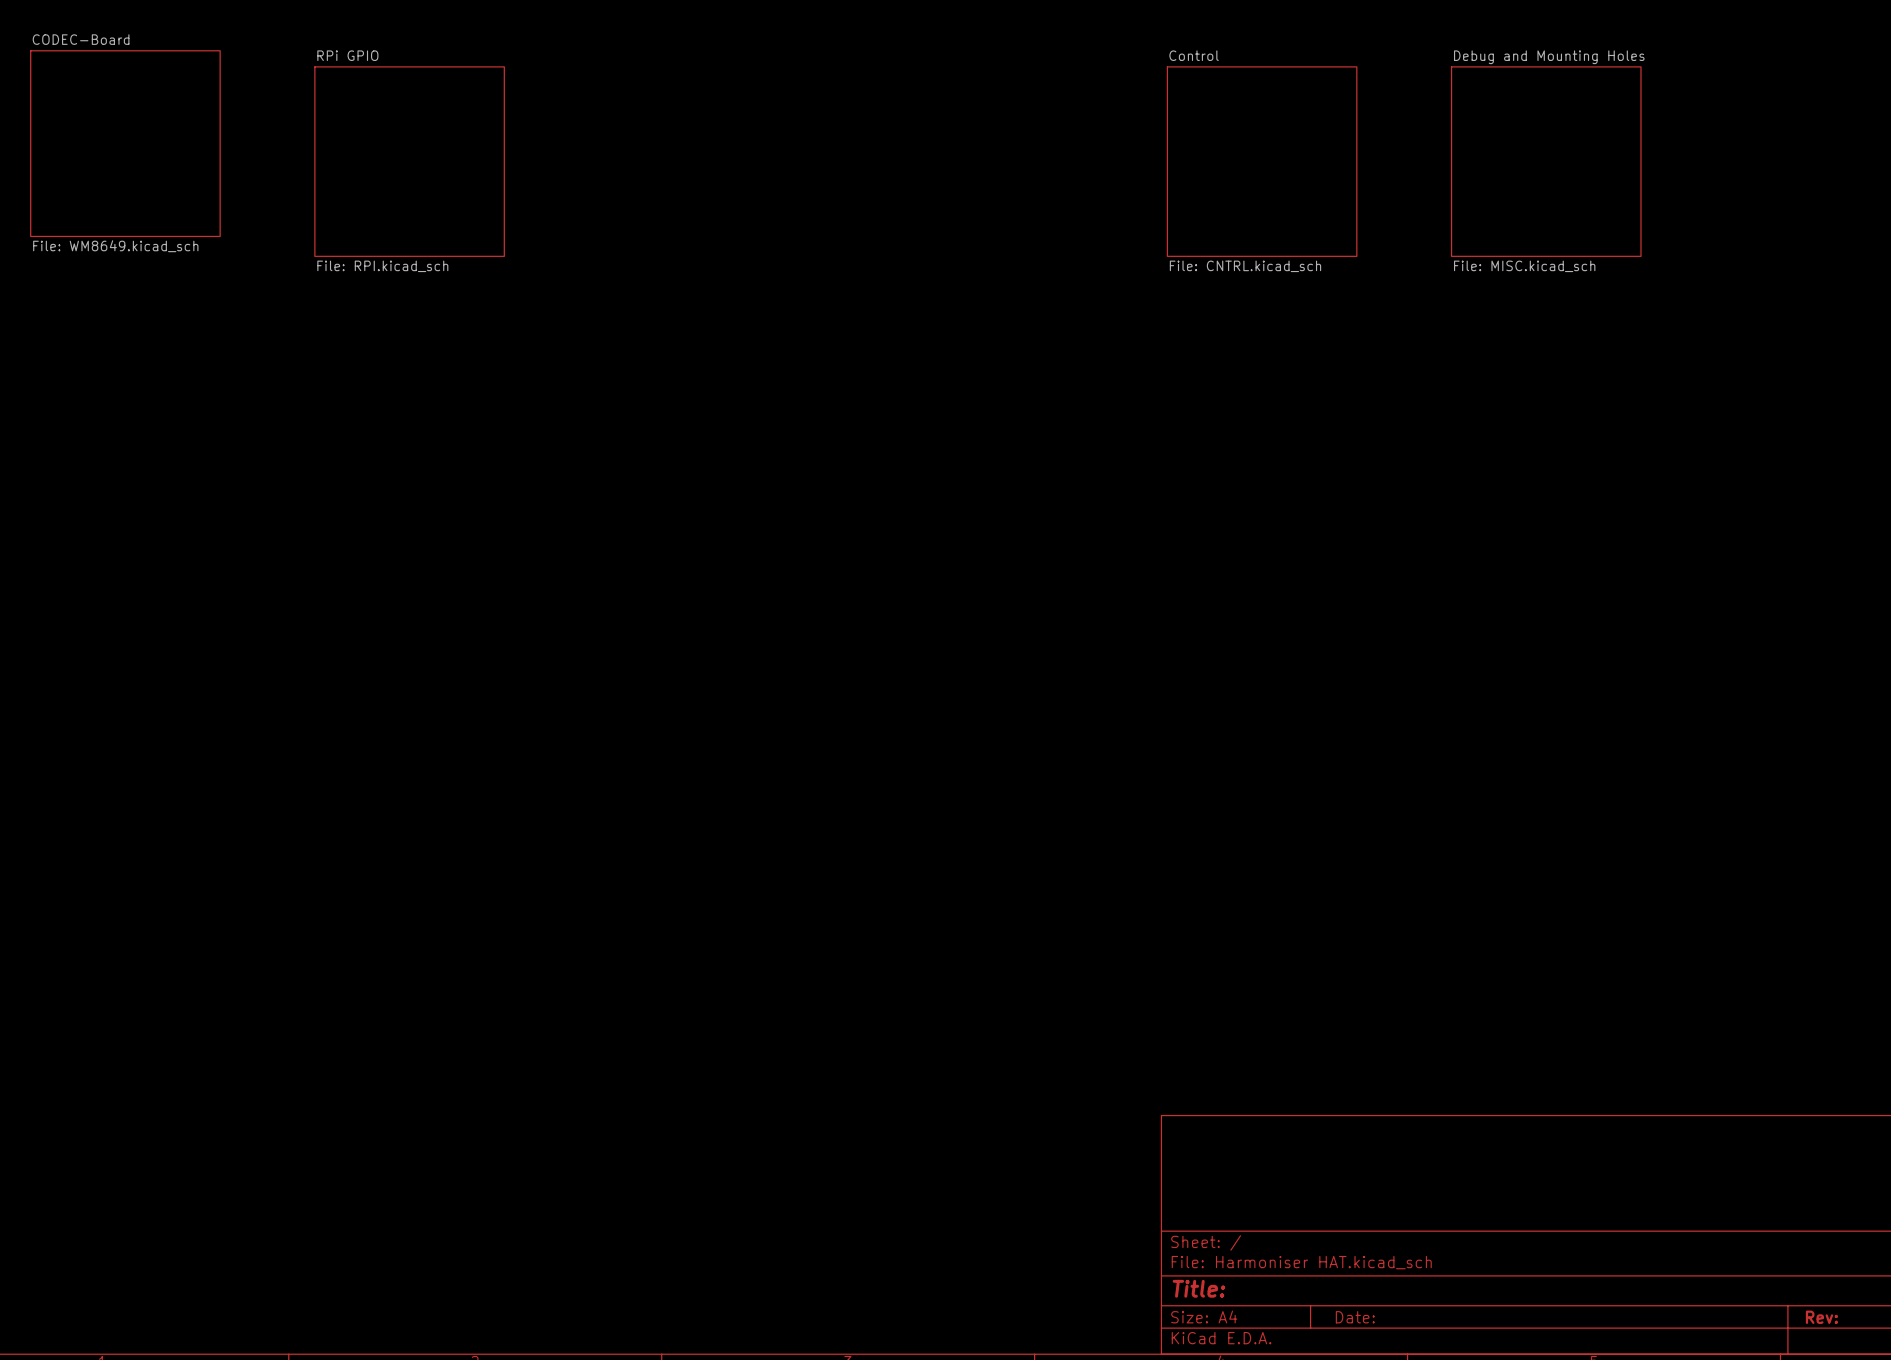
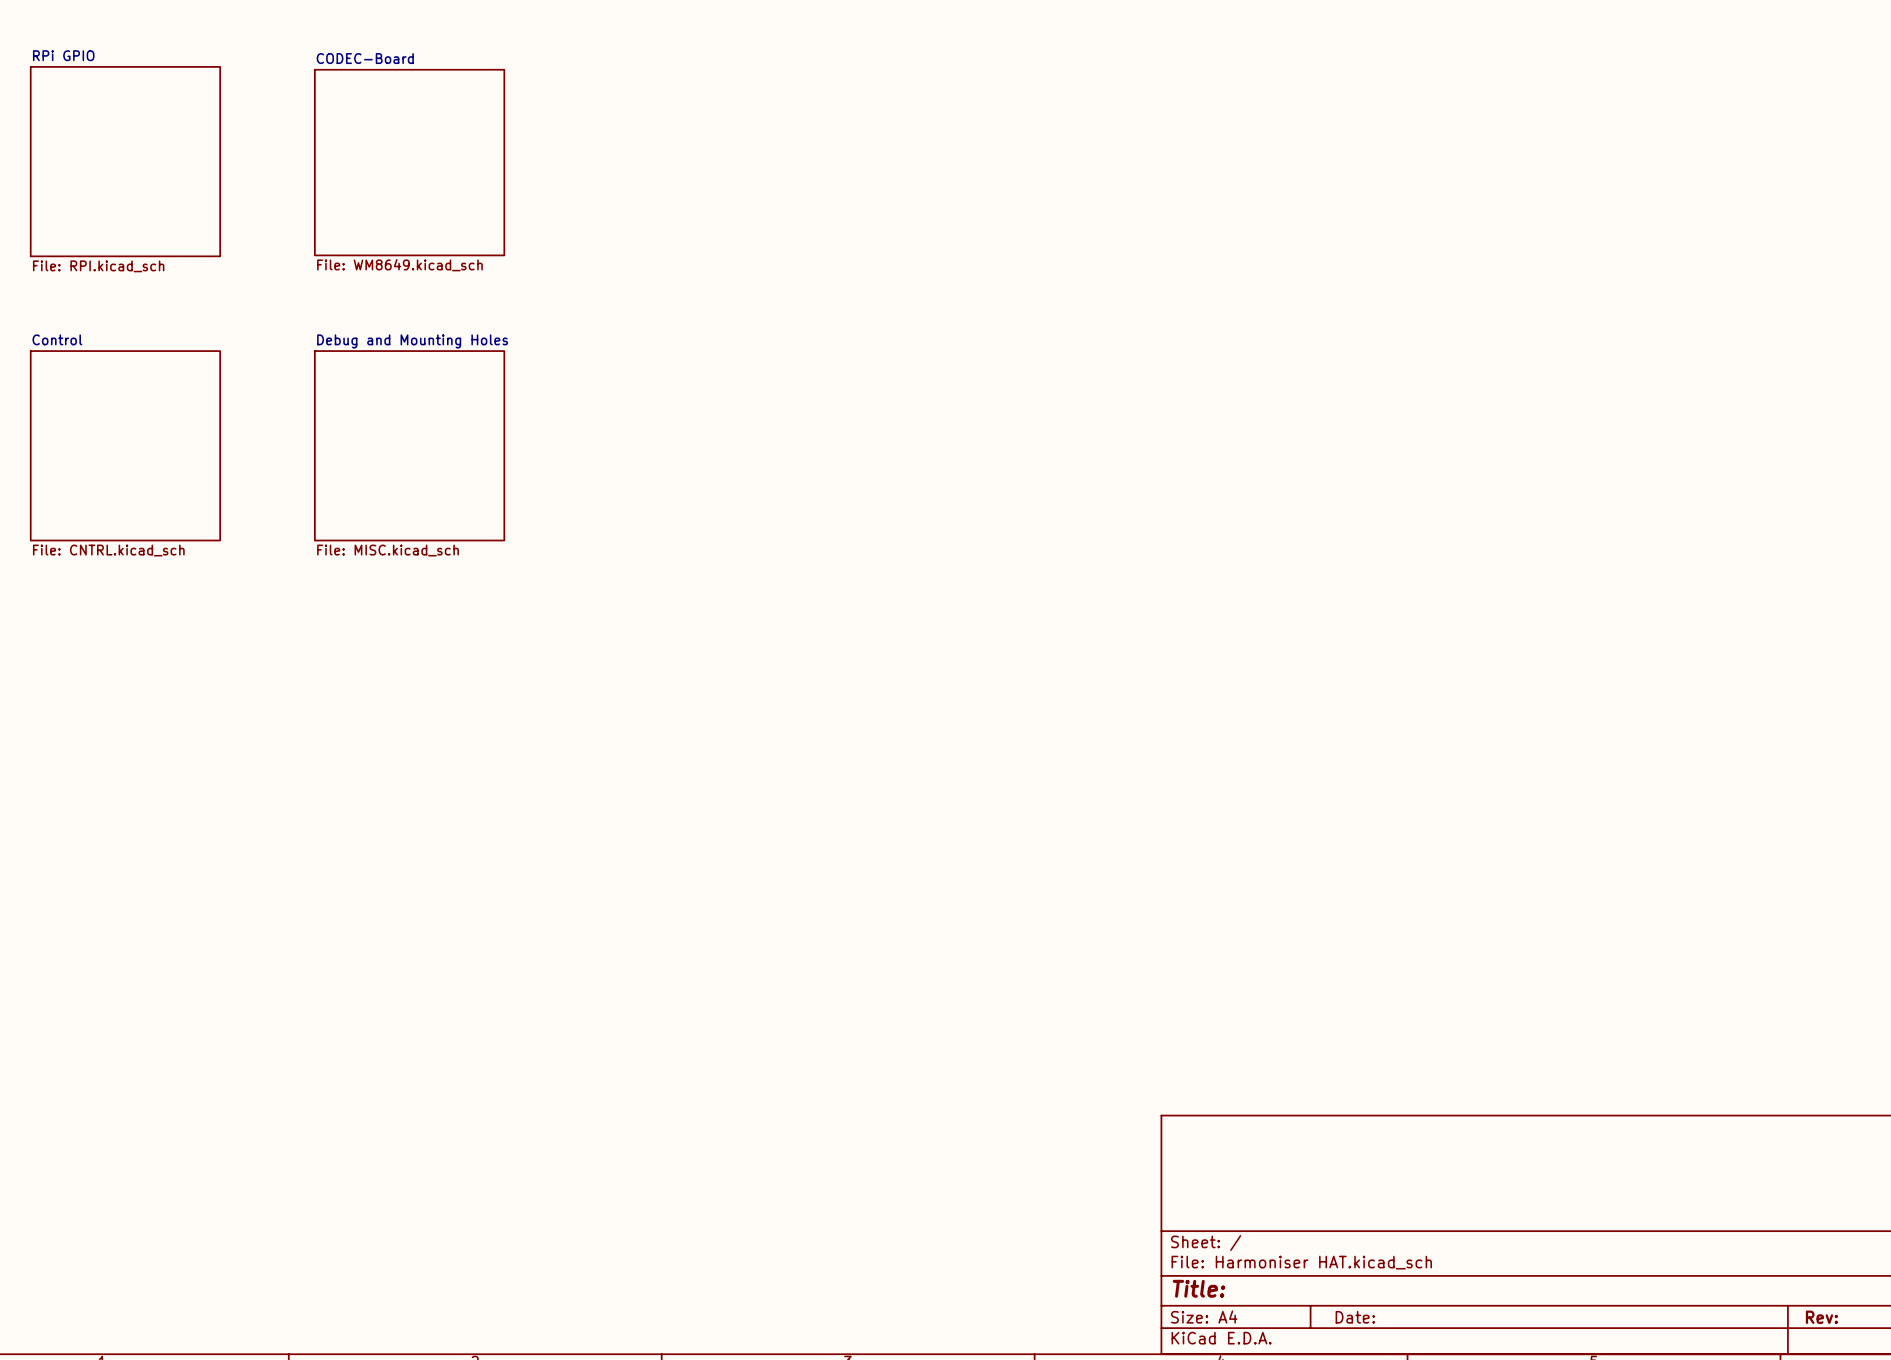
sheet CODEC-Board: File: WM8649.kicad_sch (125, 143) -> none
sheet RPi GPIO: none -> File: RPI.kicad_sch (125, 161)
sheet RPi GPIO: File: RPI.kicad_sch (409, 161) -> none
sheet Control: File: CNTRL.kicad_sch (1262, 161) -> none
sheet Debug and Mounting Holes: File: MISC.kicad_sch (1546, 161) -> none
sheet CODEC-Board: none -> File: WM8649.kicad_sch (409, 162)
sheet Control: none -> File: CNTRL.kicad_sch (125, 445)
sheet Debug and Mounting Holes: none -> File: MISC.kicad_sch (409, 445)

